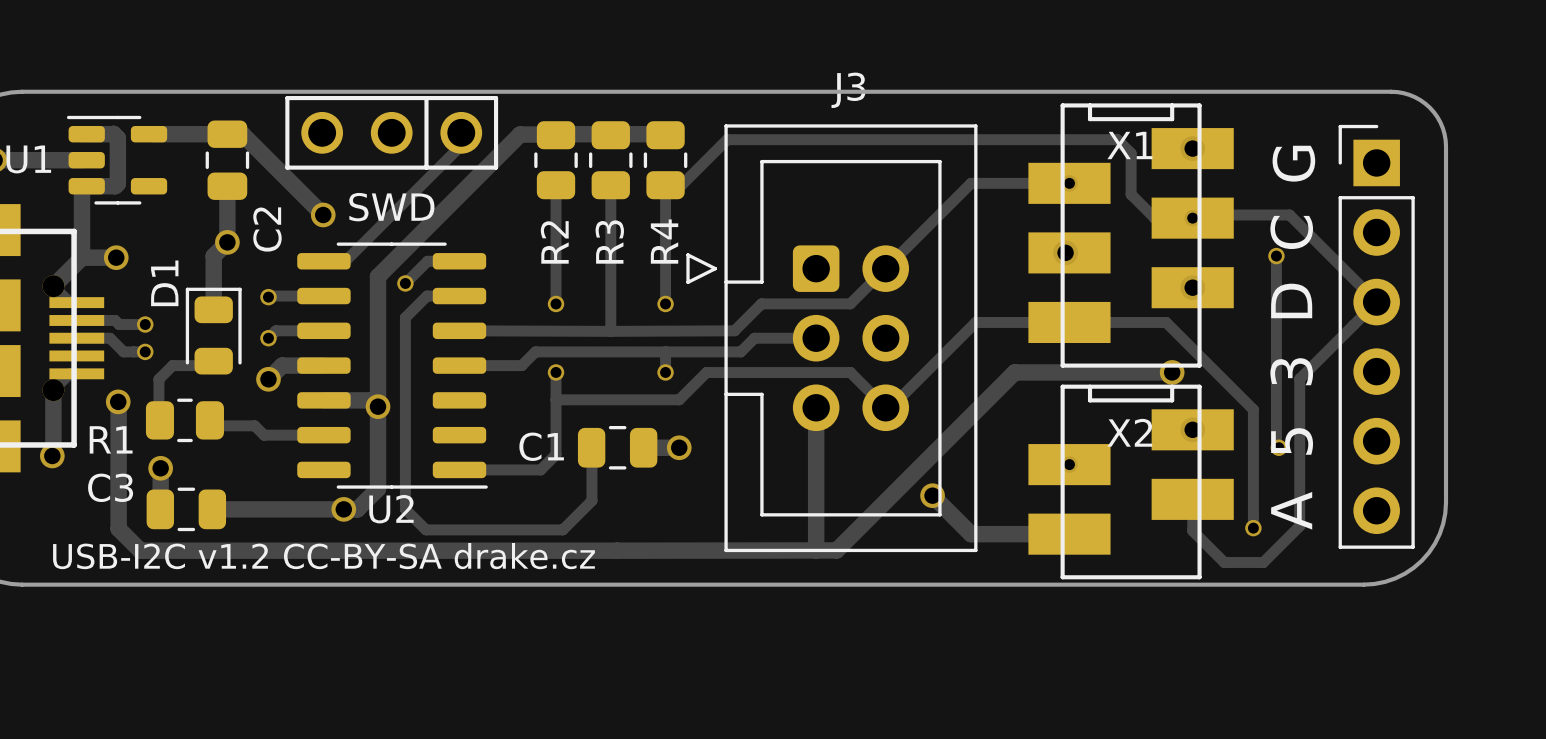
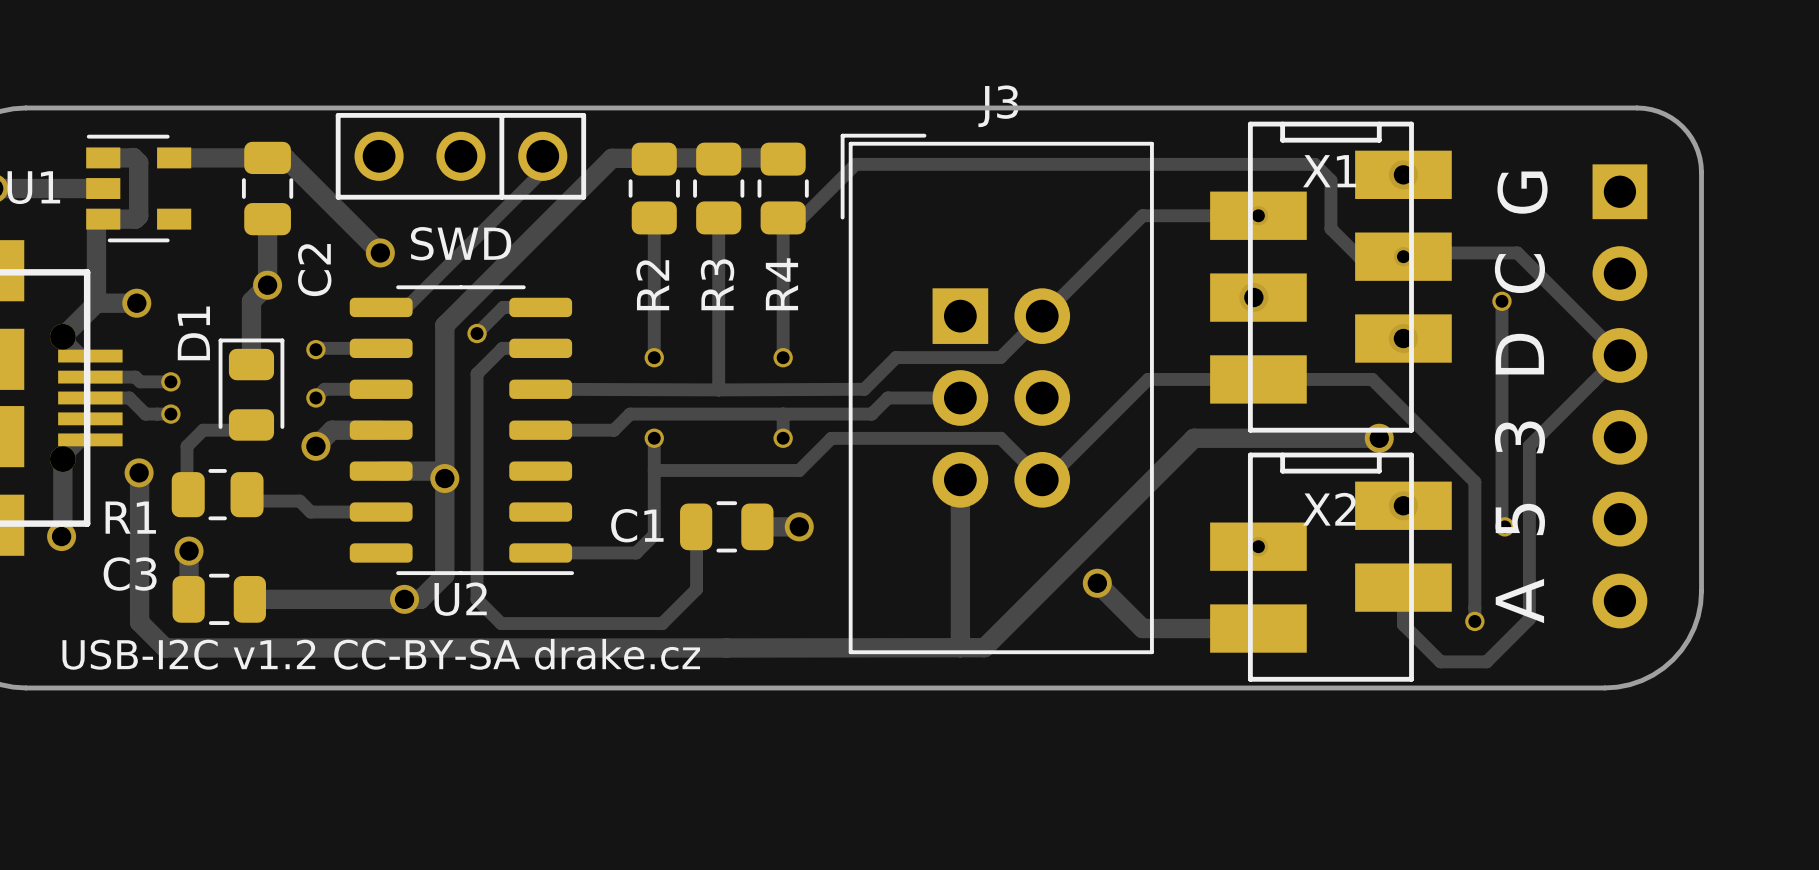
U1 footprint: [66, 115, 168, 205] -> [86, 134, 192, 243]
J3 footprint: [686, 124, 978, 553] -> [840, 133, 1154, 655]
part side: top (1376, 336) -> bottom (1619, 396)

